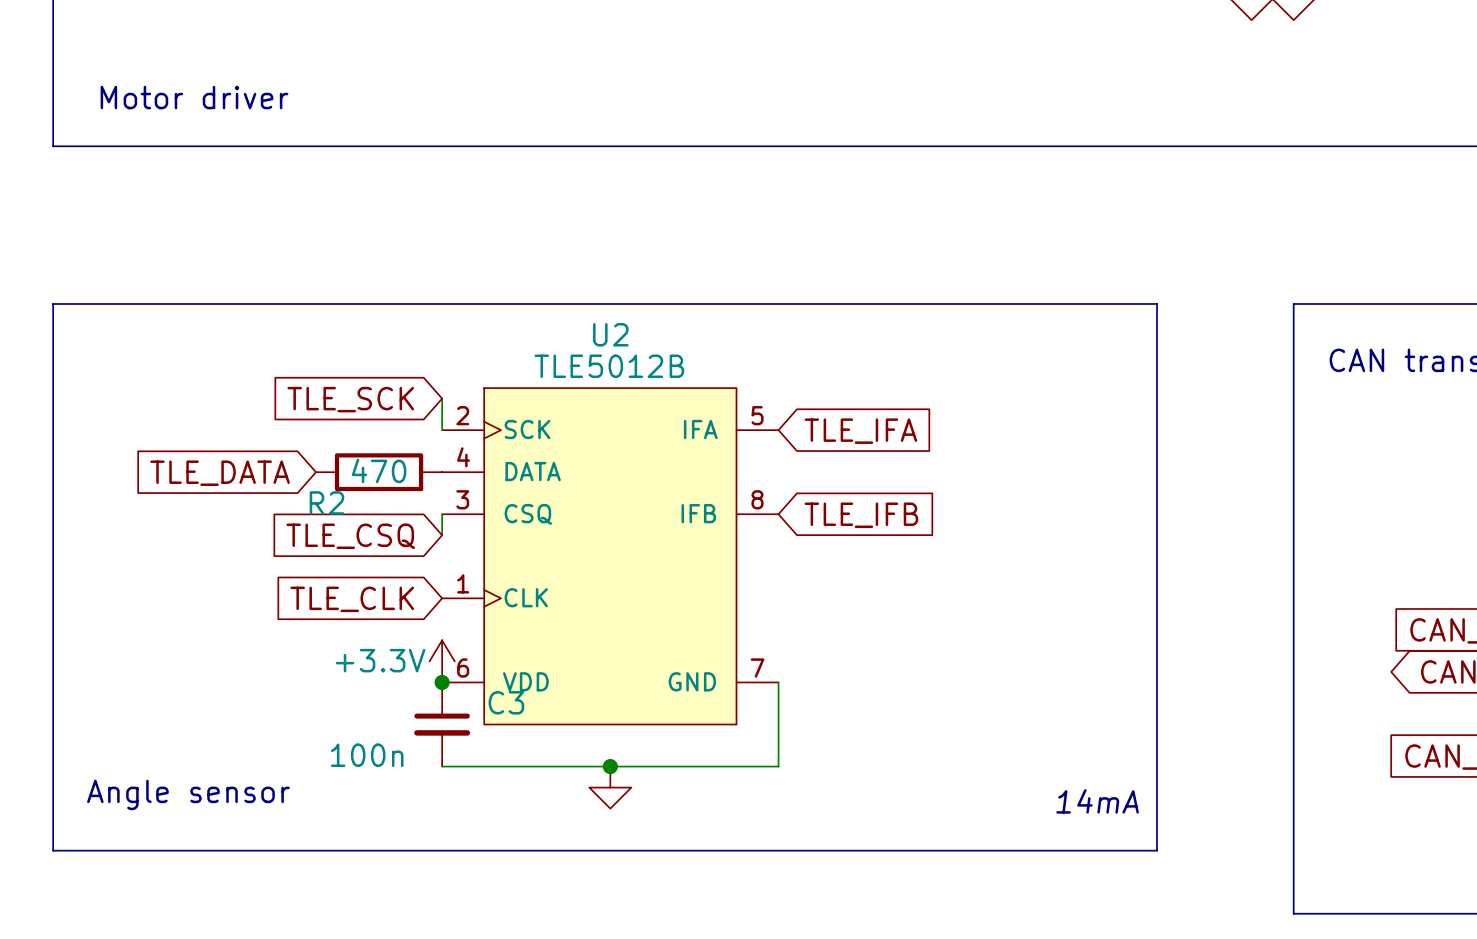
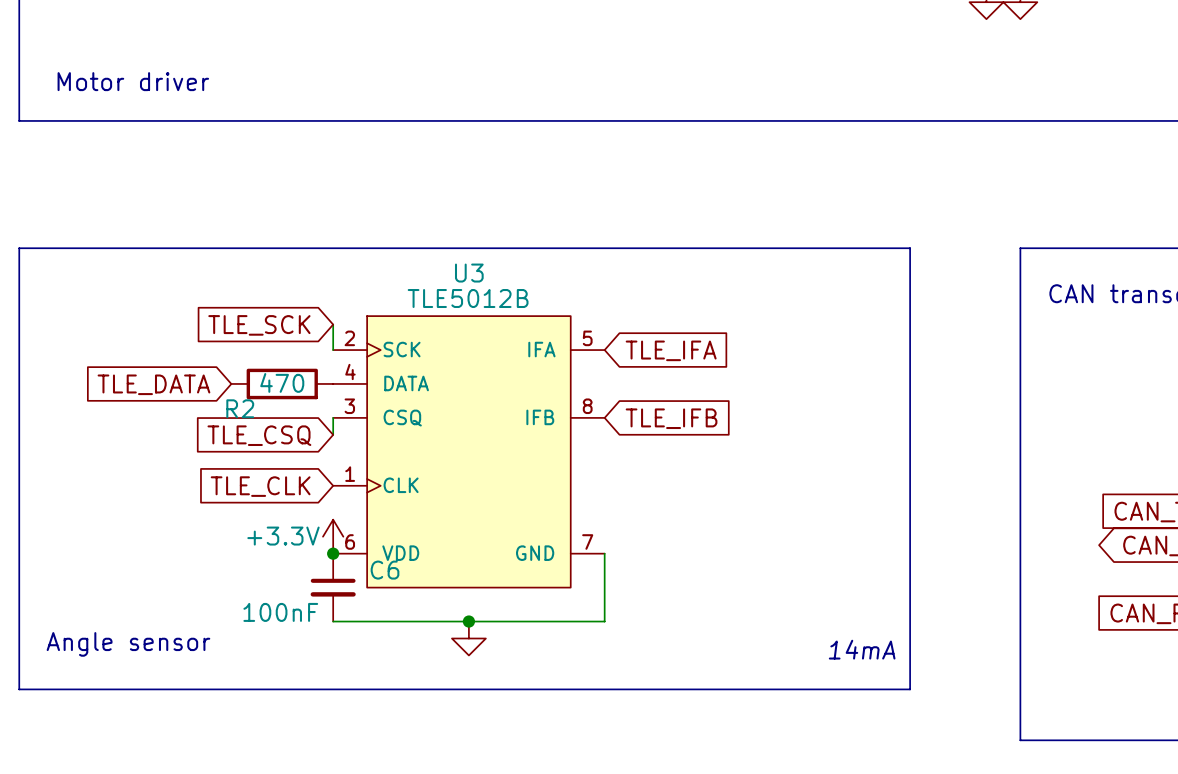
U2 name: U2 (610, 334) -> U3 (469, 273)
C3 name: C3 (506, 702) -> C6 (385, 570)
C3 value: 100n (367, 755) -> 100nF (280, 612)

